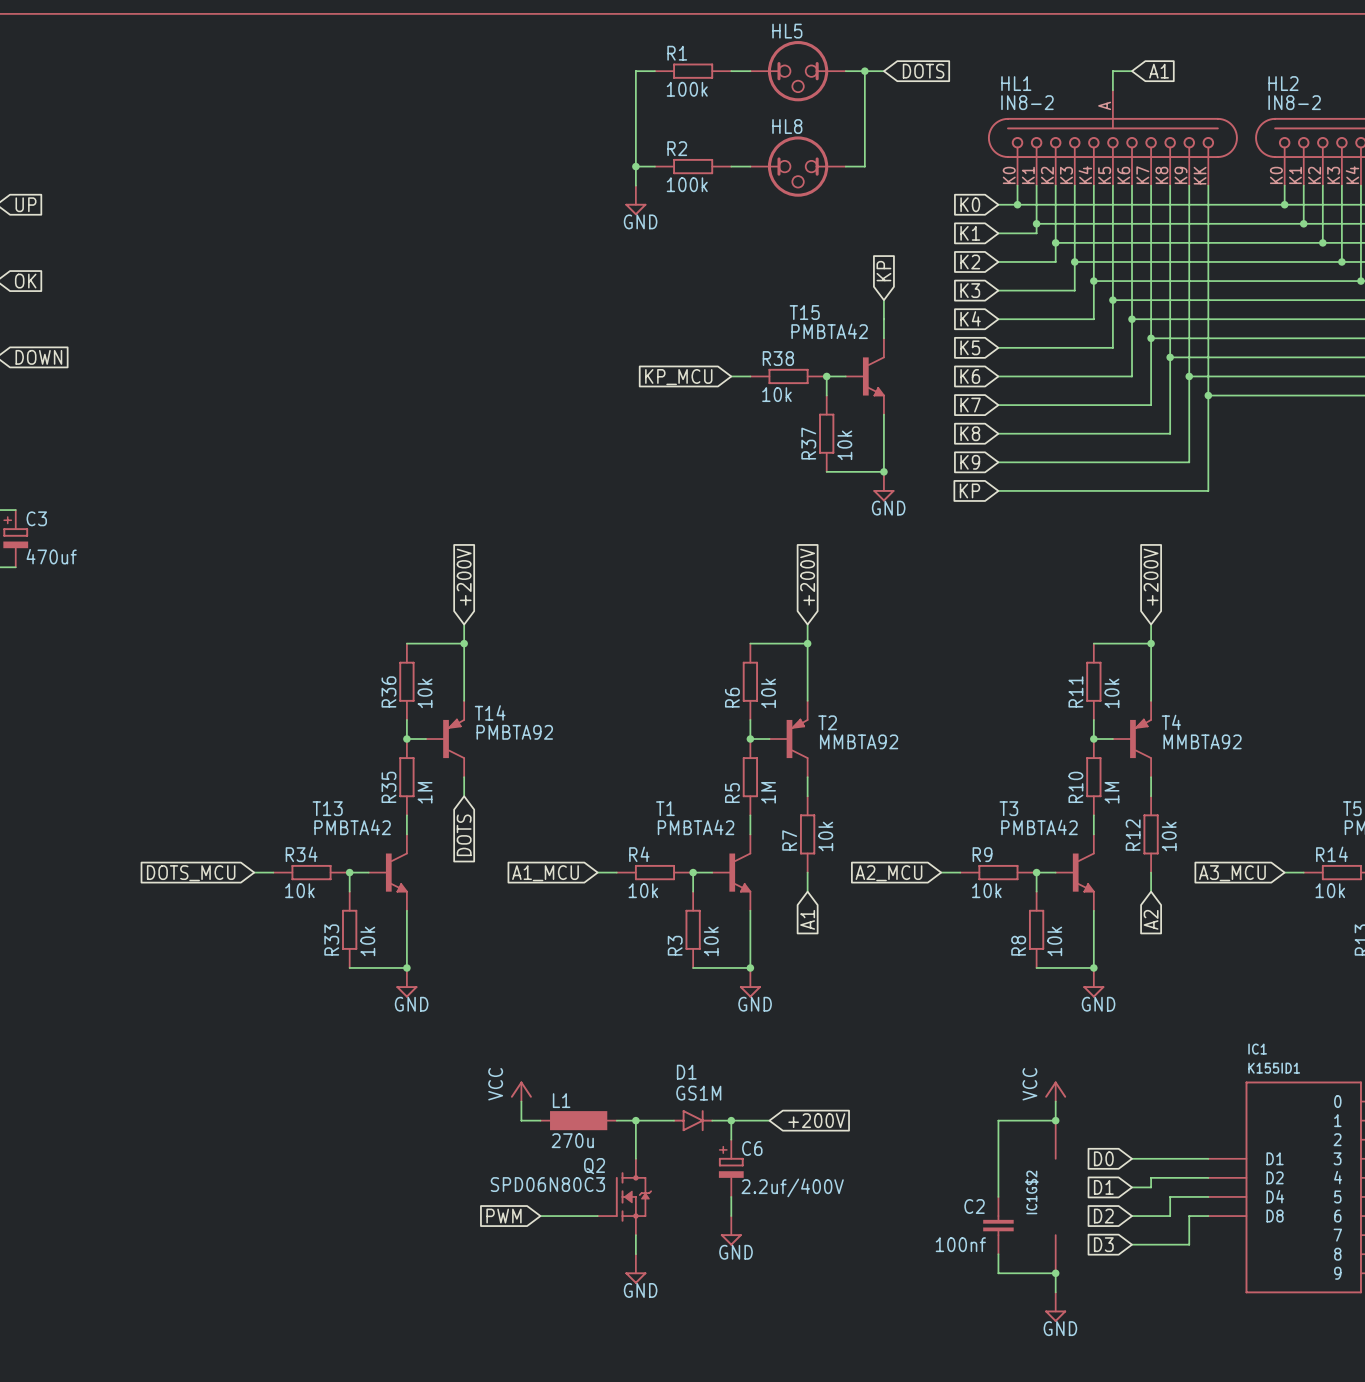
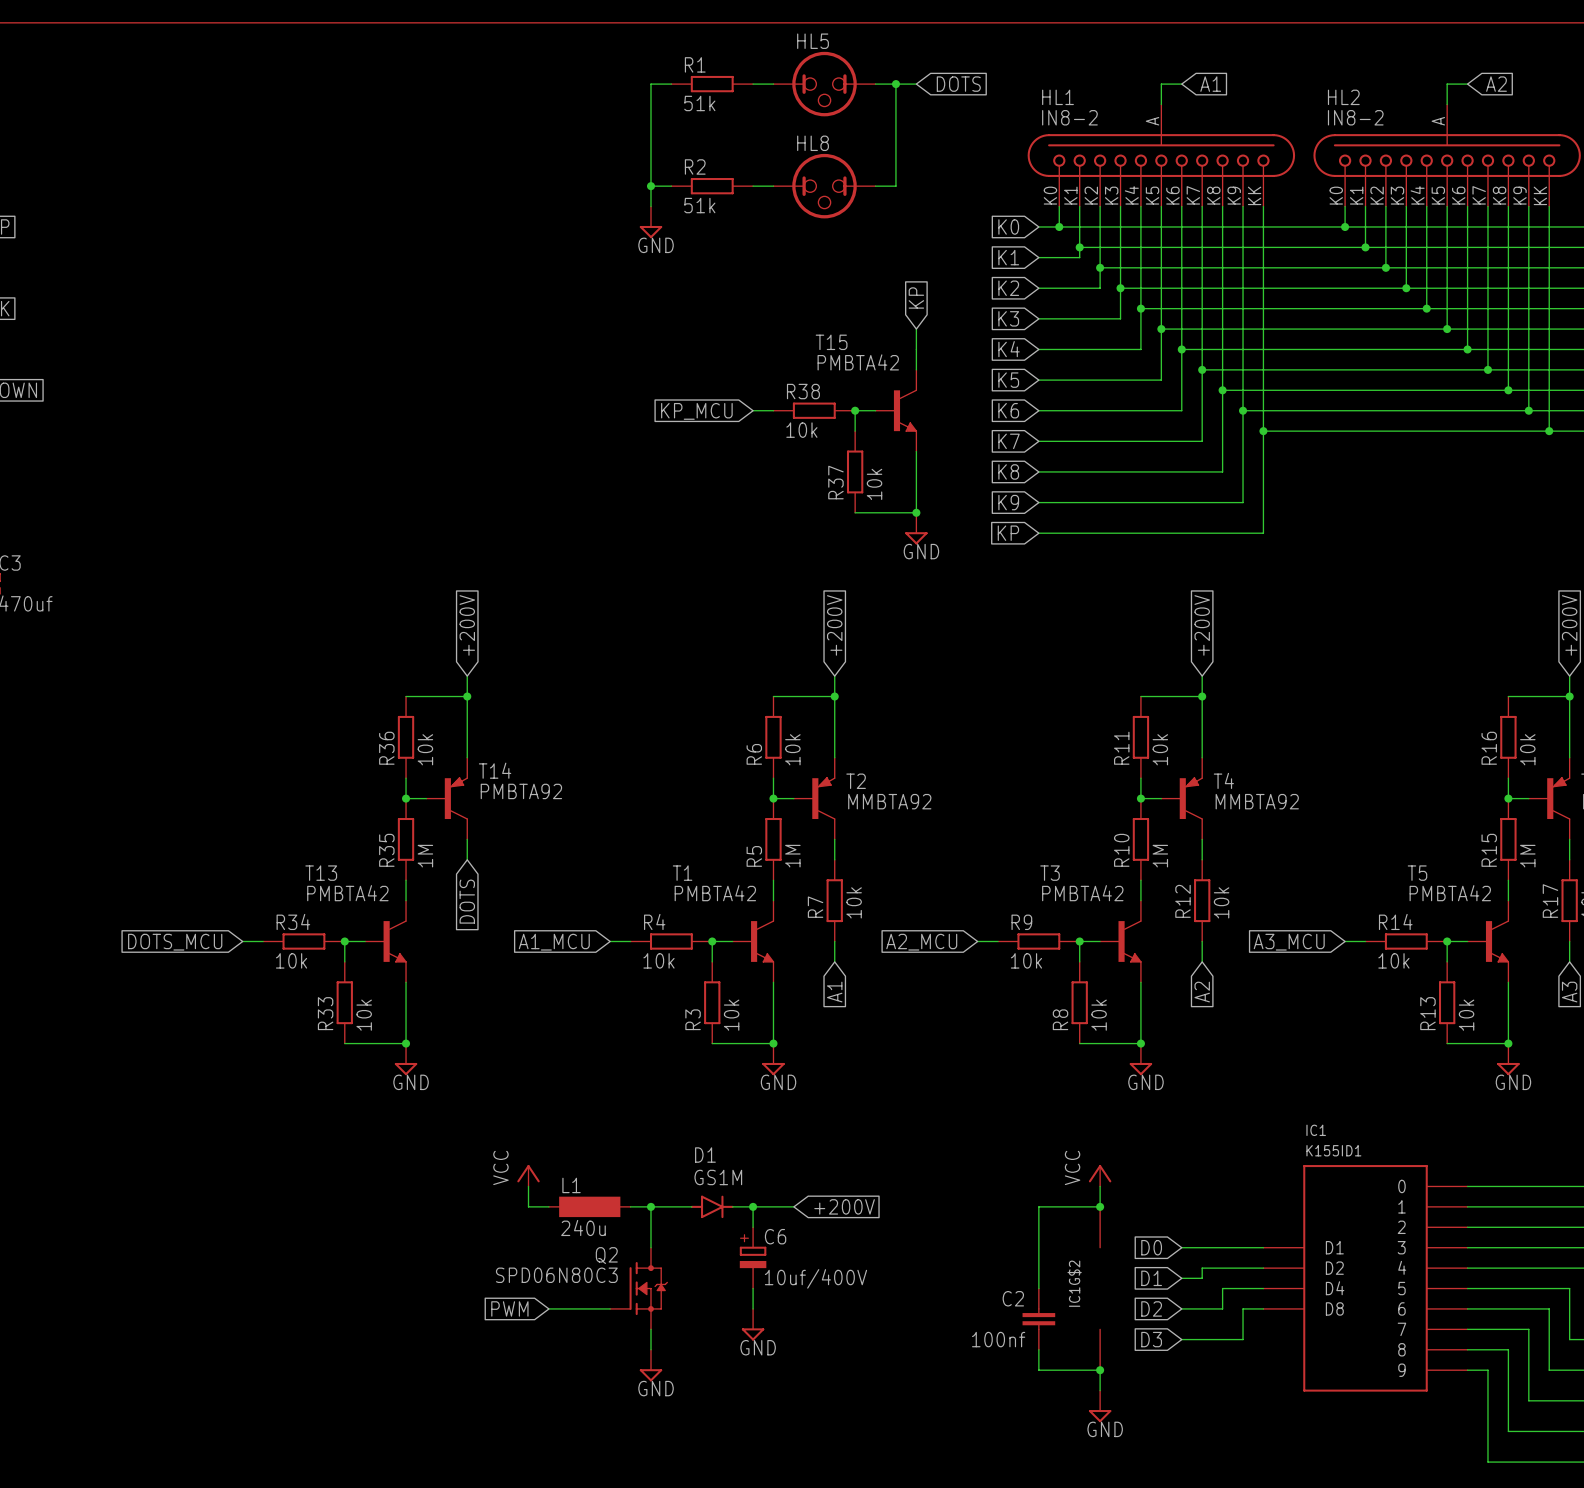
R1 value: 100k (687, 89) -> 51k (699, 103)
R2 value: 100k (687, 184) -> 51k (699, 205)
L1 value: 270u (572, 1140) -> 240u (583, 1227)
C6 value: 2.2uf/400V (792, 1187) -> 10uf/400V (815, 1278)

